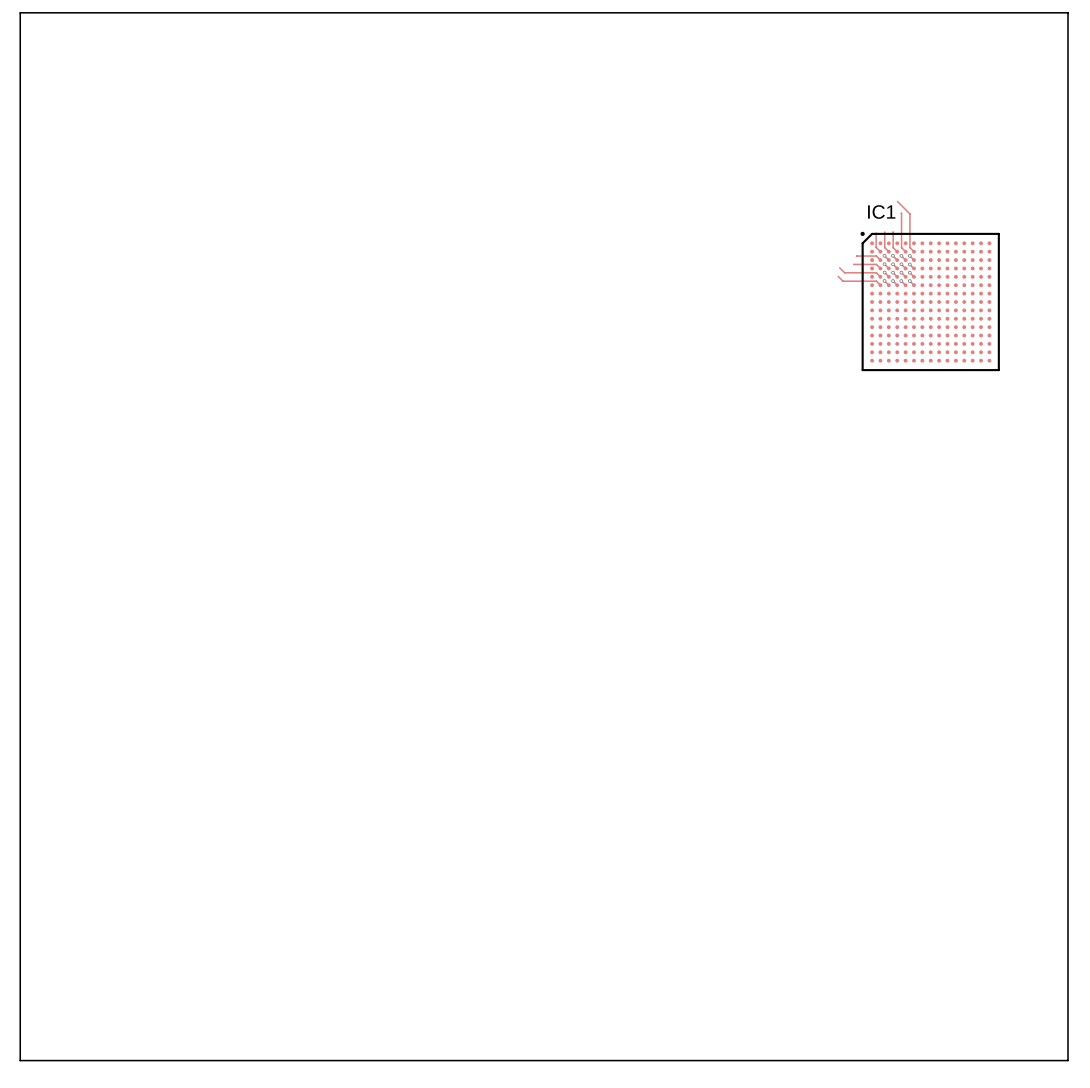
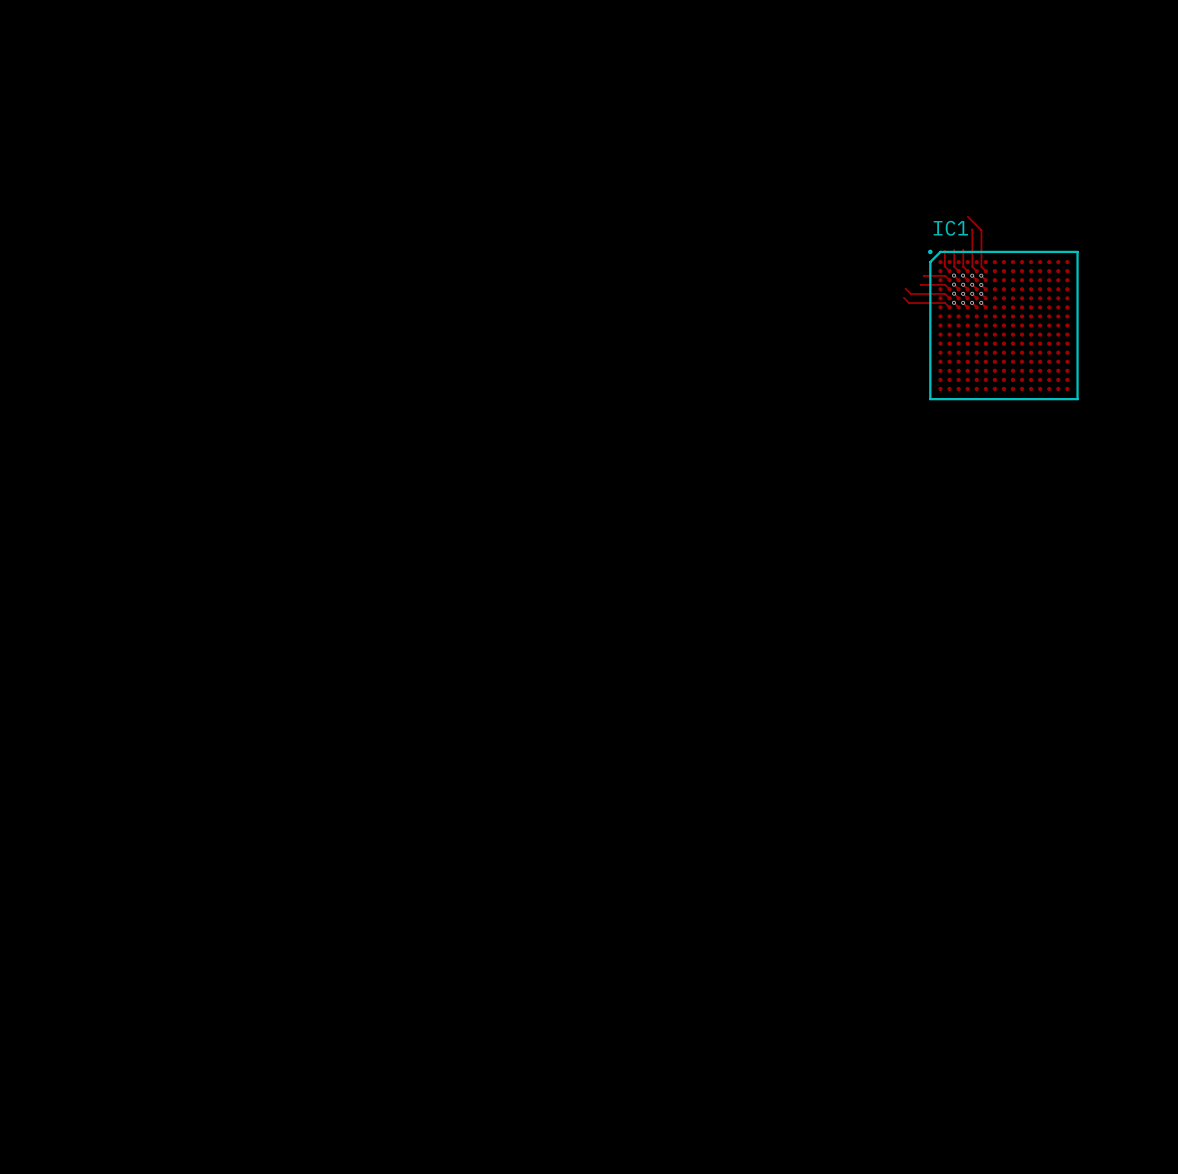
board edge: (20, 12) (20, 1060) (1068, 1060) (1068, 12) (20, 12) -> none

